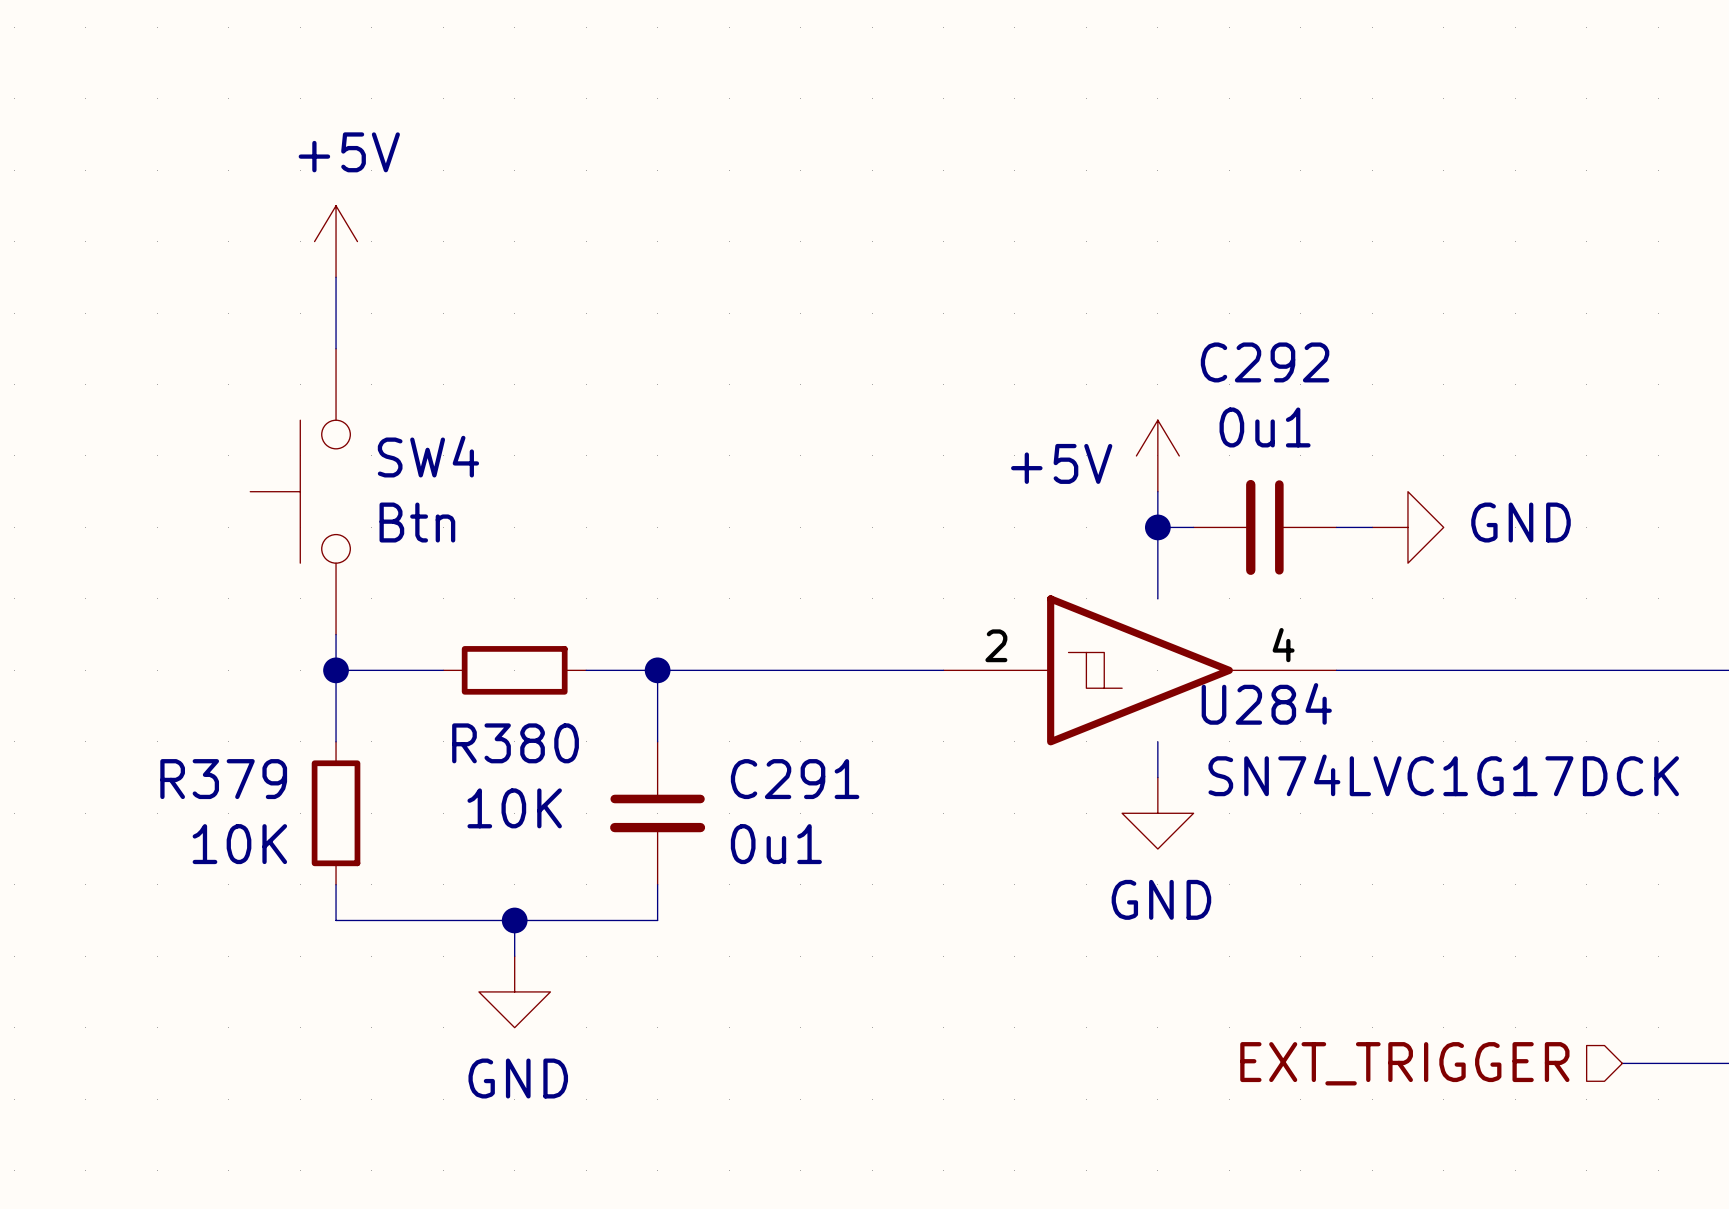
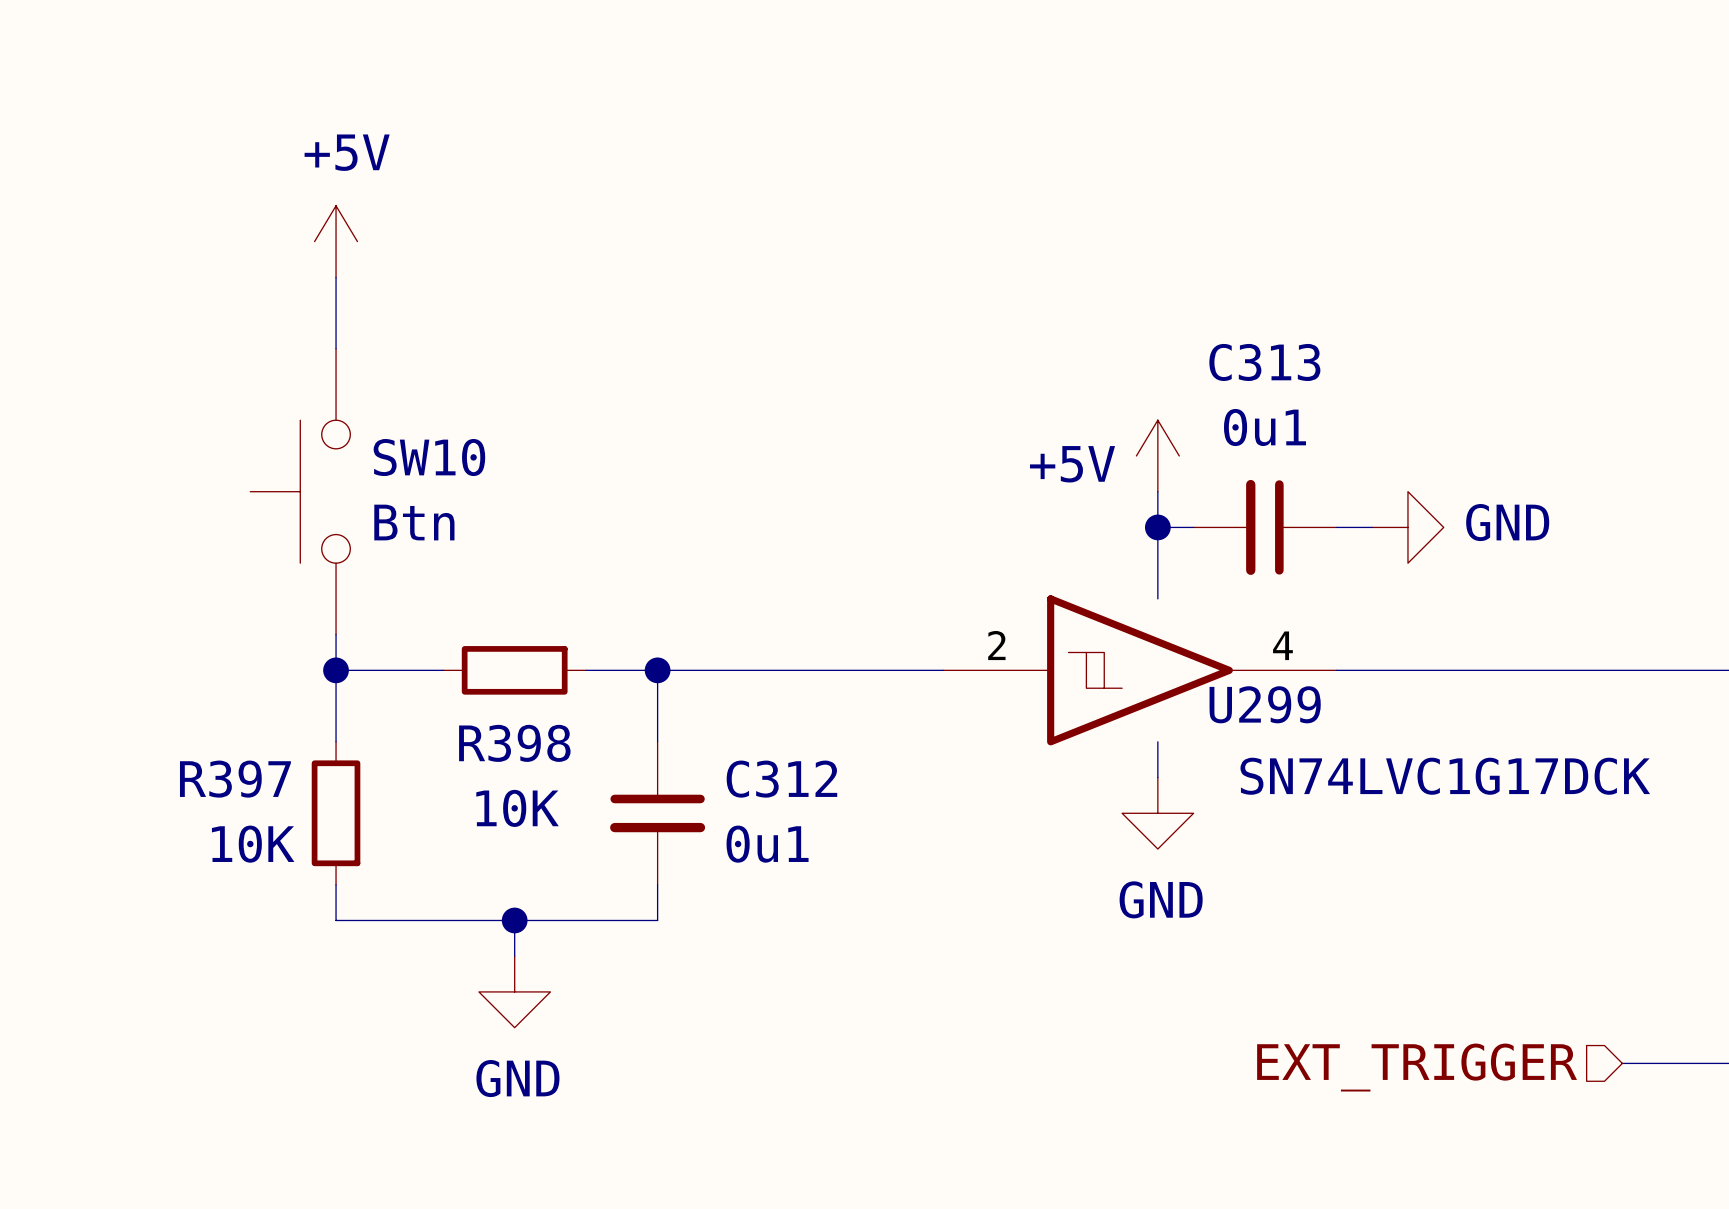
C292 name: C292 (1265, 362) -> C313 (1264, 362)
SW4 name: SW4 (428, 456) -> SW10 (429, 457)
U284 name: U284 (1266, 703) -> U299 (1265, 704)
R380 name: R380 (515, 743) -> R398 (514, 743)
R379 name: R379 (223, 779) -> R397 (235, 779)
C291 name: C291 (795, 779) -> C312 (781, 779)

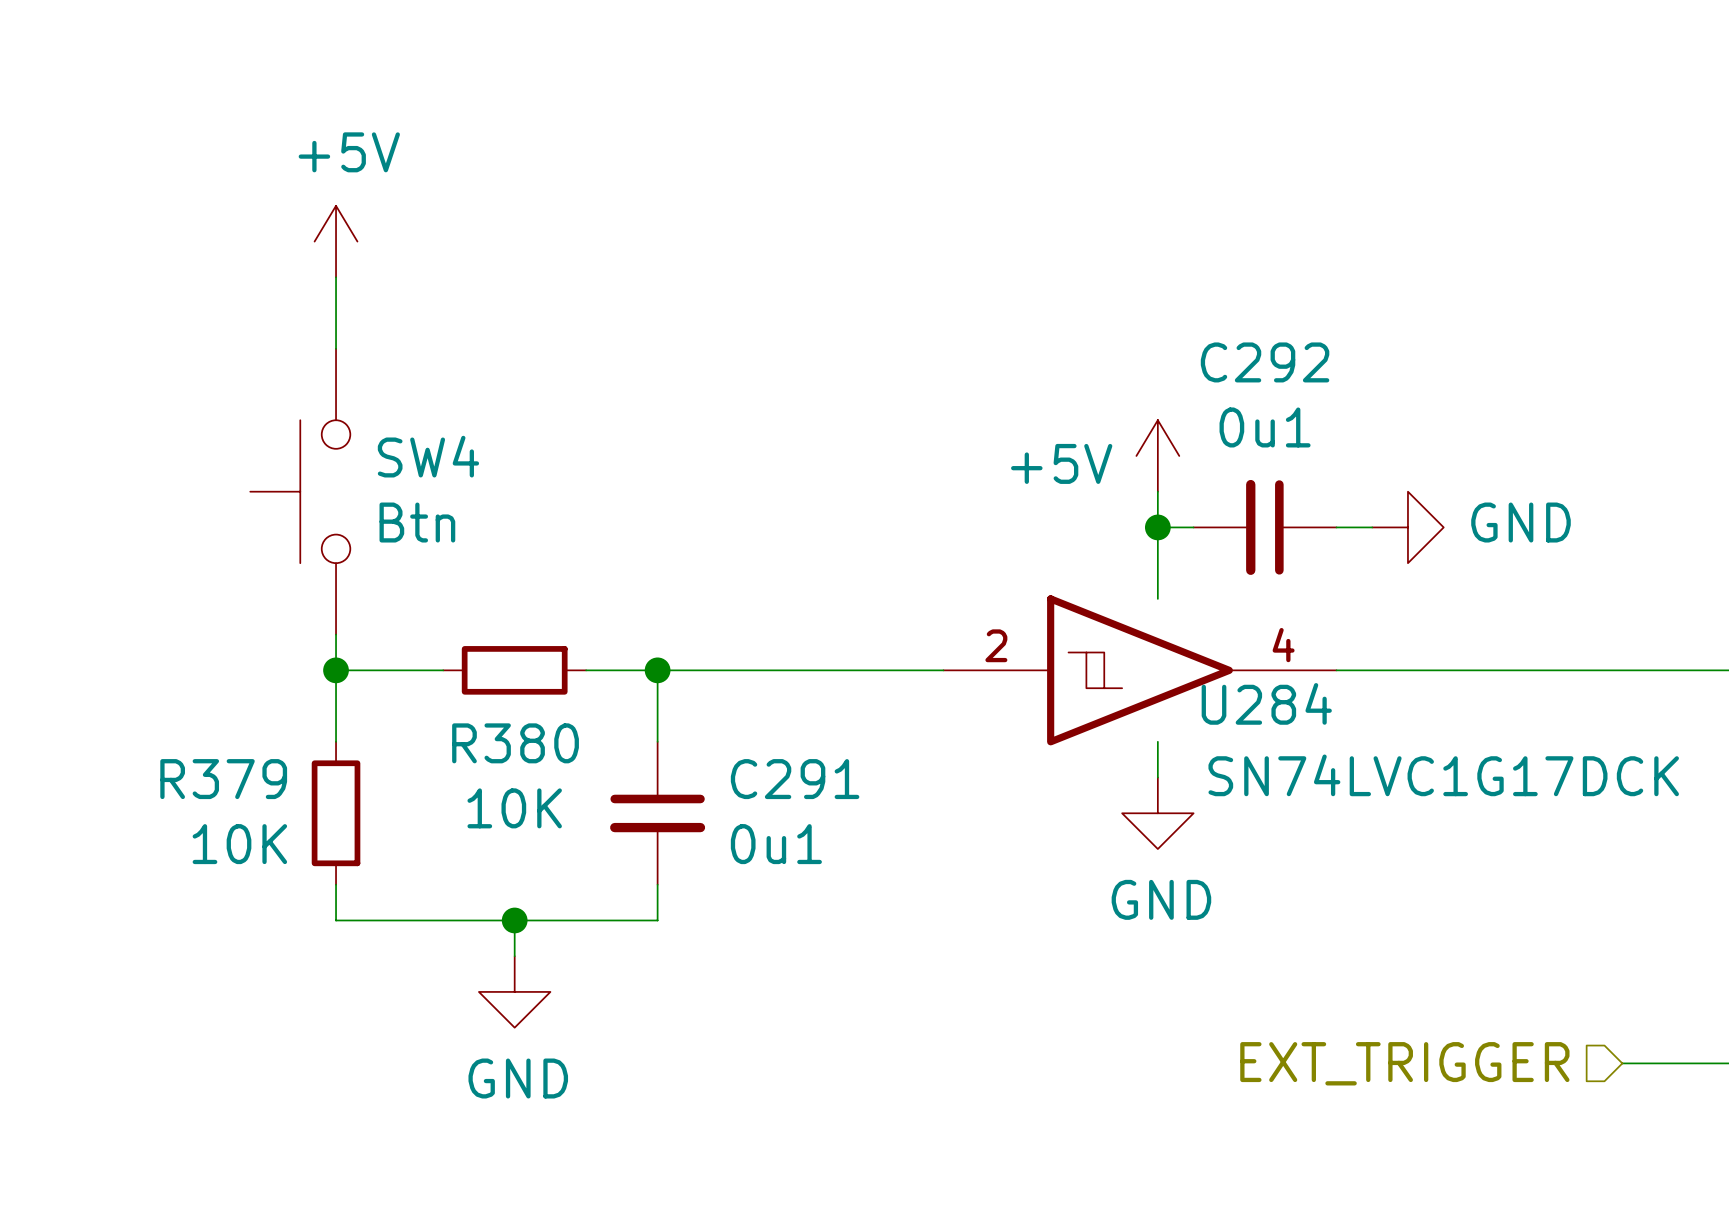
C313 name: C313 (1264, 362) -> C292 (1265, 362)
SW10 name: SW10 (429, 457) -> SW4 (428, 456)
U299 name: U299 (1265, 704) -> U284 (1266, 703)
R398 name: R398 (514, 743) -> R380 (515, 743)
R397 name: R397 (235, 779) -> R379 (223, 779)
C312 name: C312 (781, 779) -> C291 (795, 779)

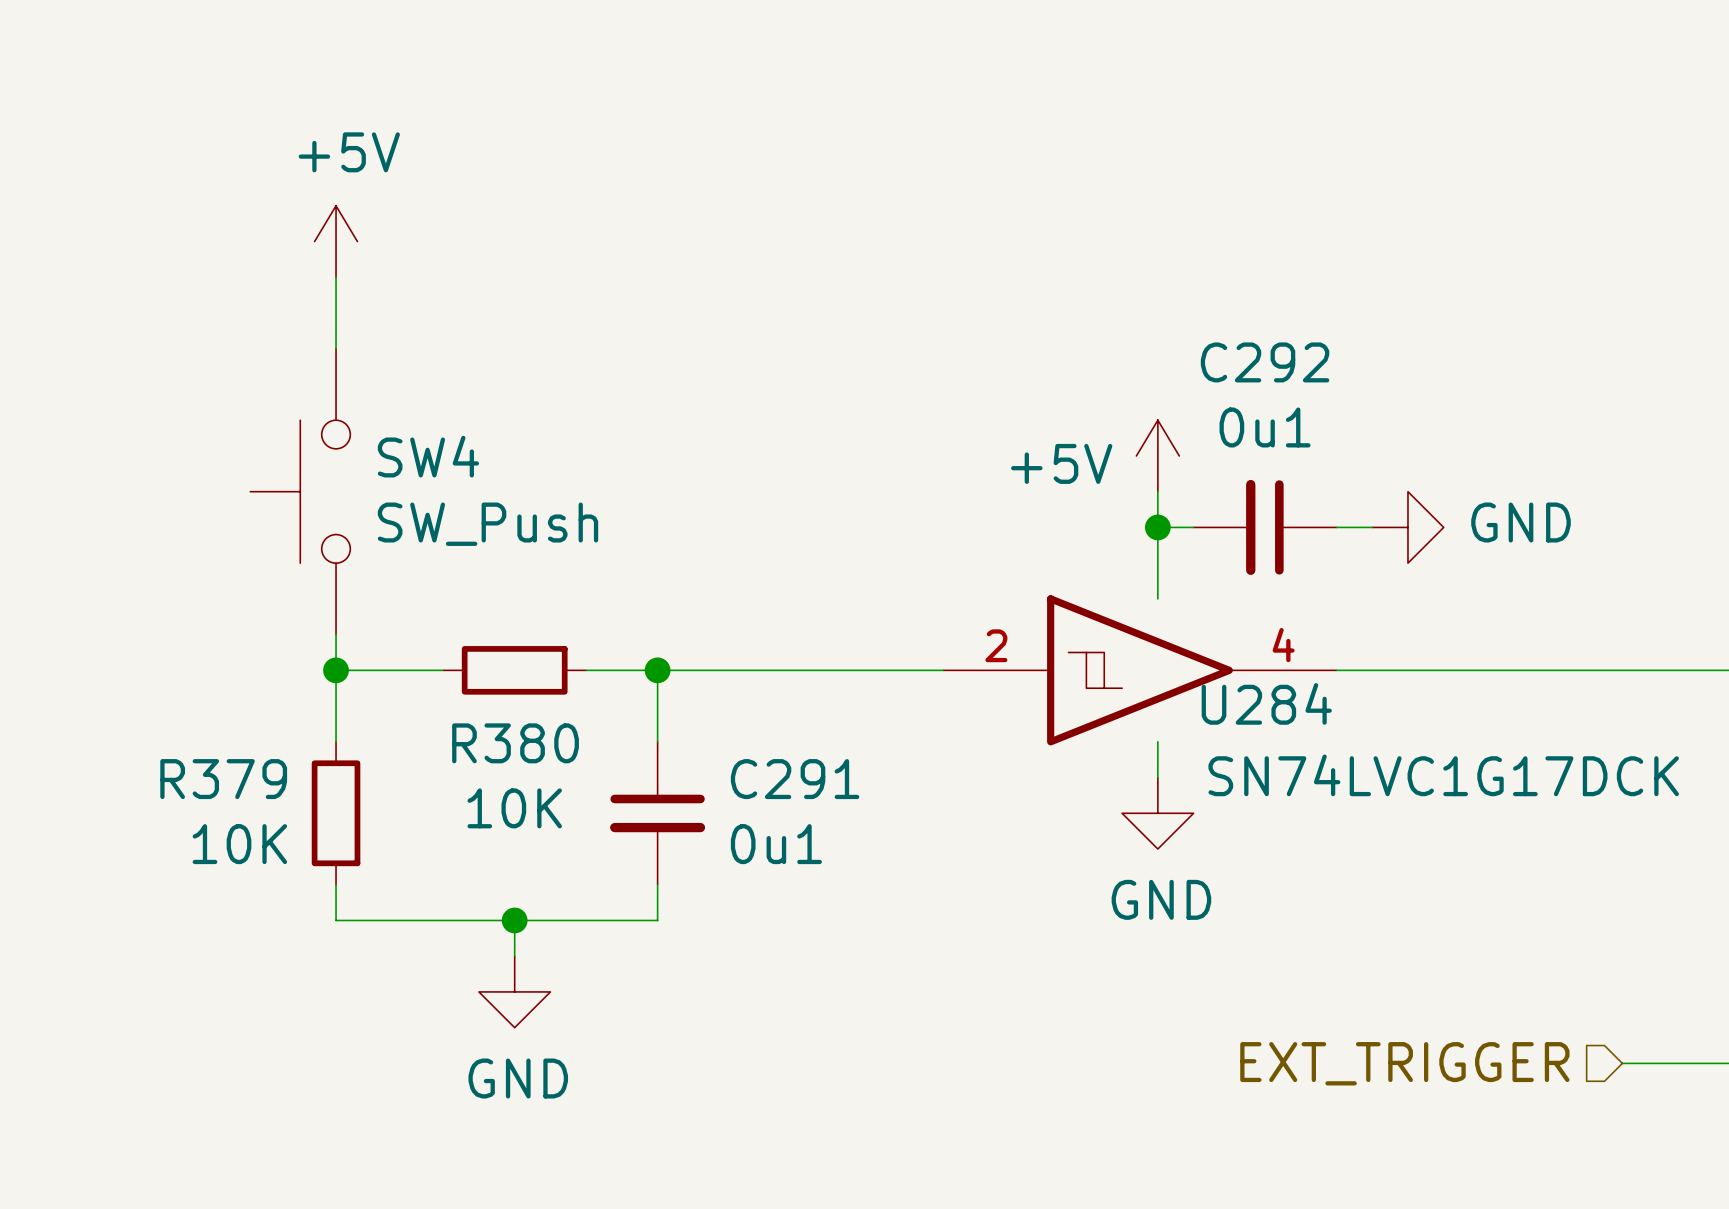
SW4 value: Btn (417, 522) -> SW_Push (488, 524)

